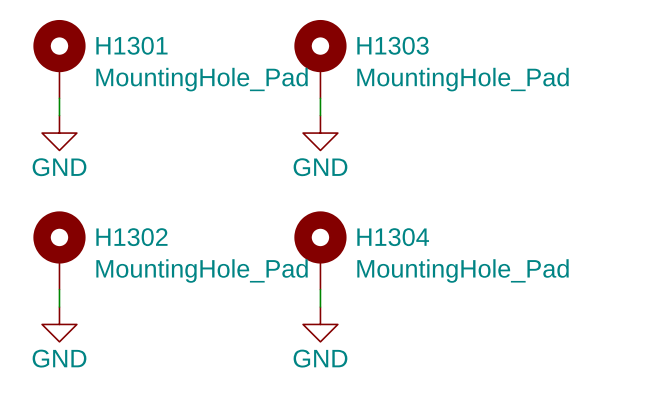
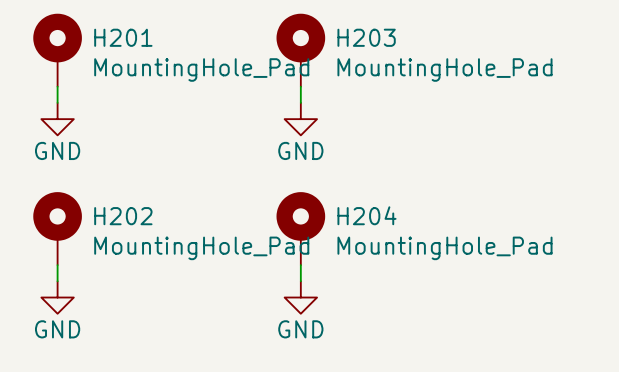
H1301 name: H1301 (131, 45) -> H201 (123, 37)
H1303 name: H1303 (392, 45) -> H203 (366, 37)
H1302 name: H1302 (131, 237) -> H202 (123, 216)
H1304 name: H1304 (393, 237) -> H204 (366, 215)

